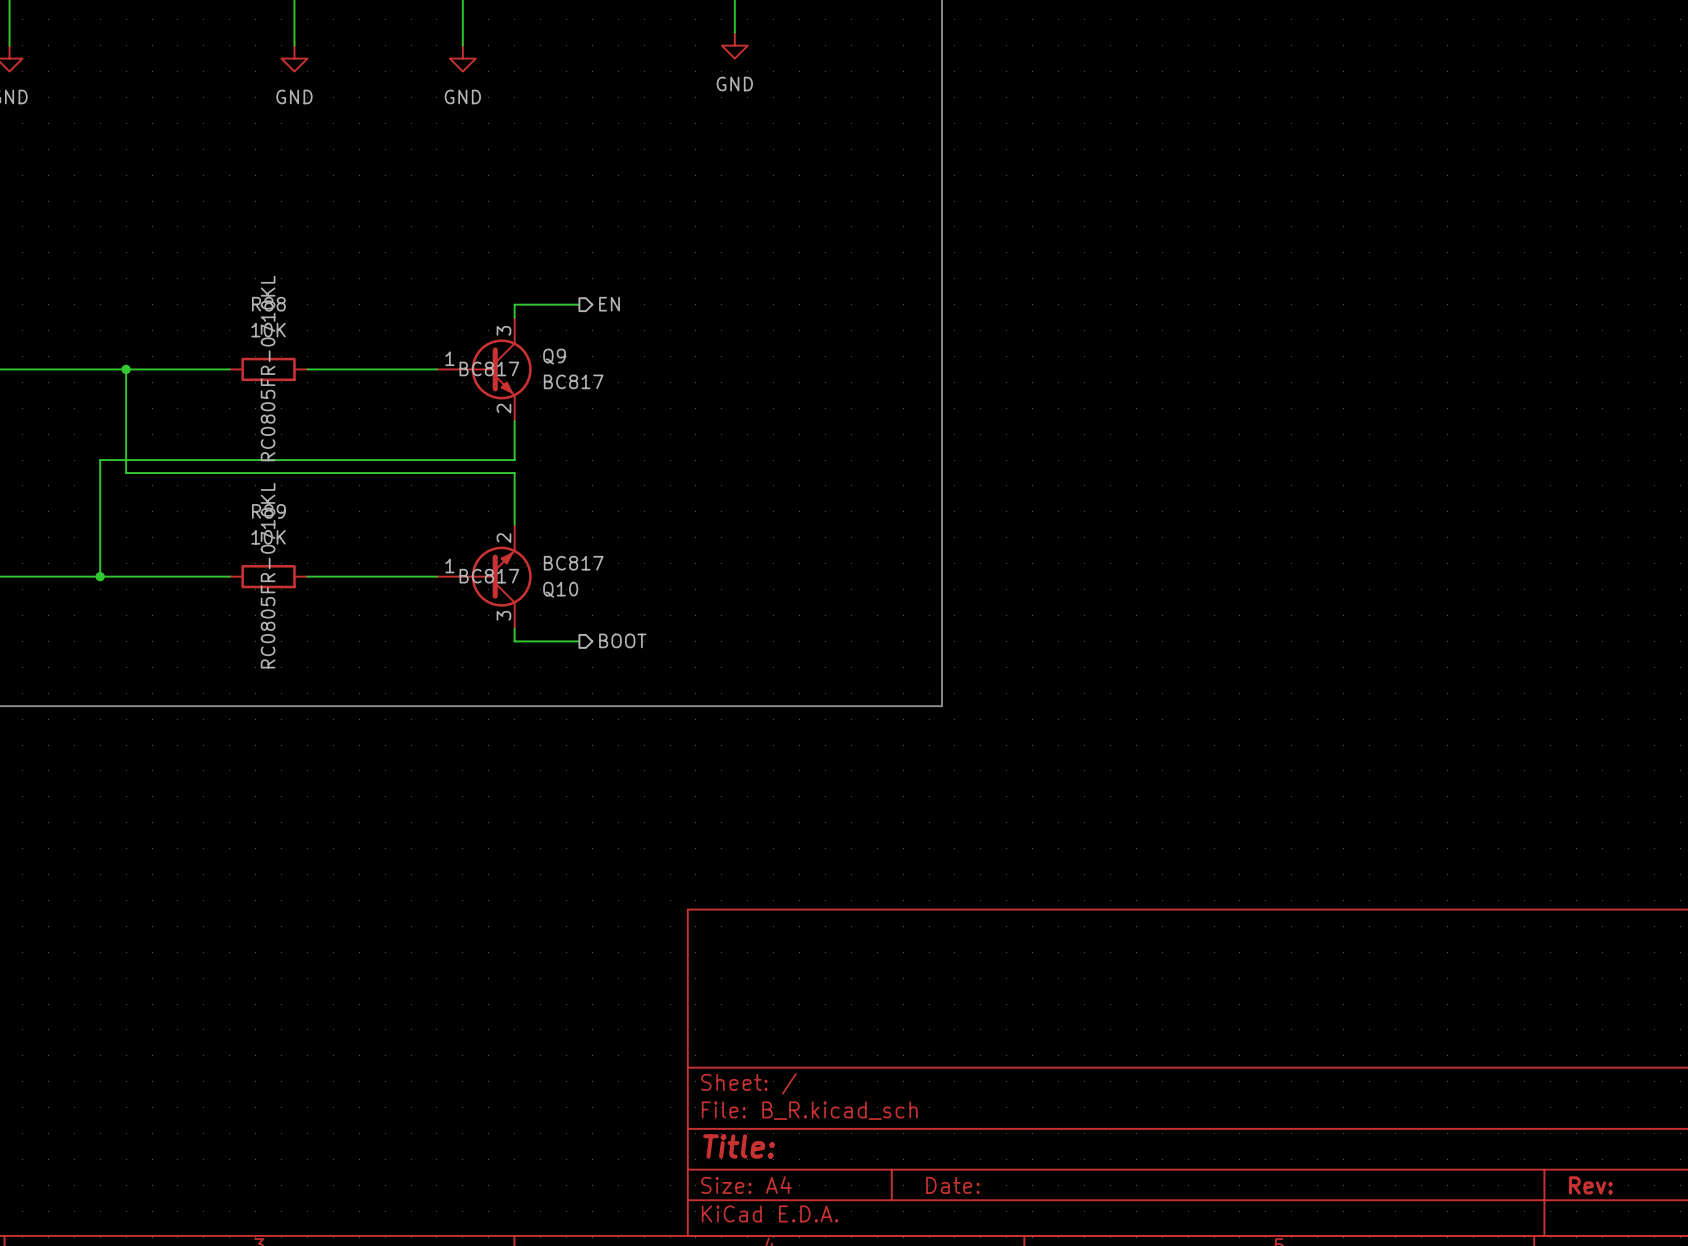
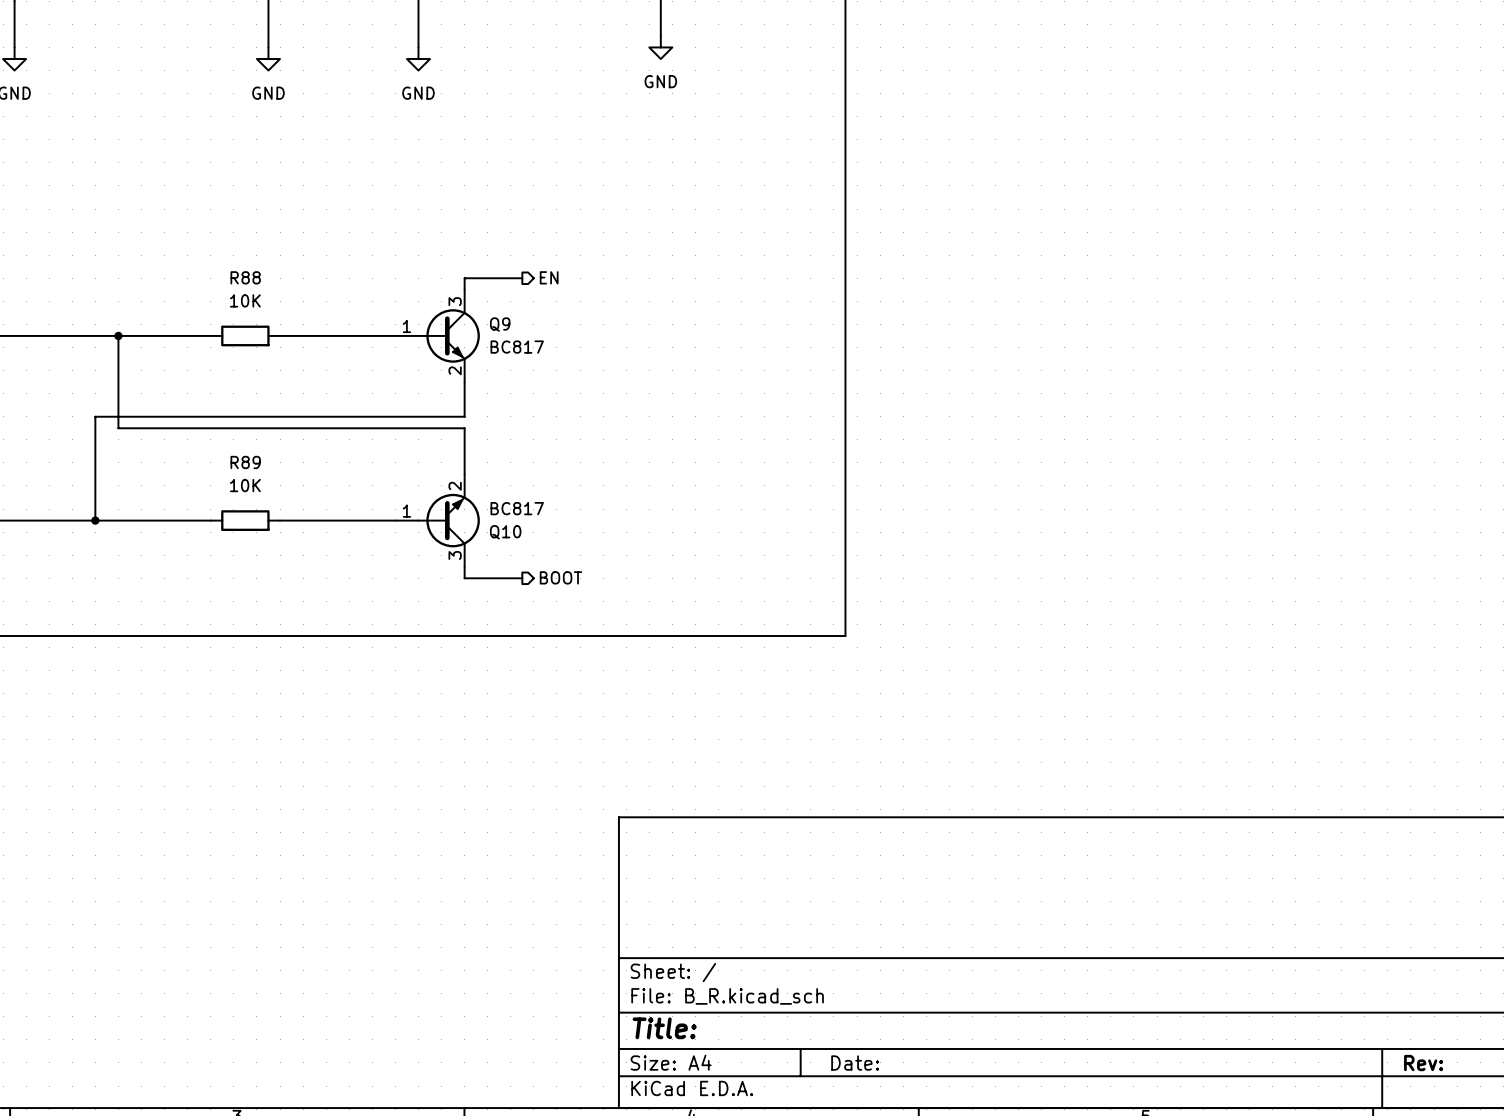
R88 text: RC0805FR-0710KL (268, 368) -> none
Q9 text: BC817 (489, 368) -> none
R89 text: RC0805FR-0710KL (268, 575) -> none
Q10 text: BC817 (489, 576) -> none

